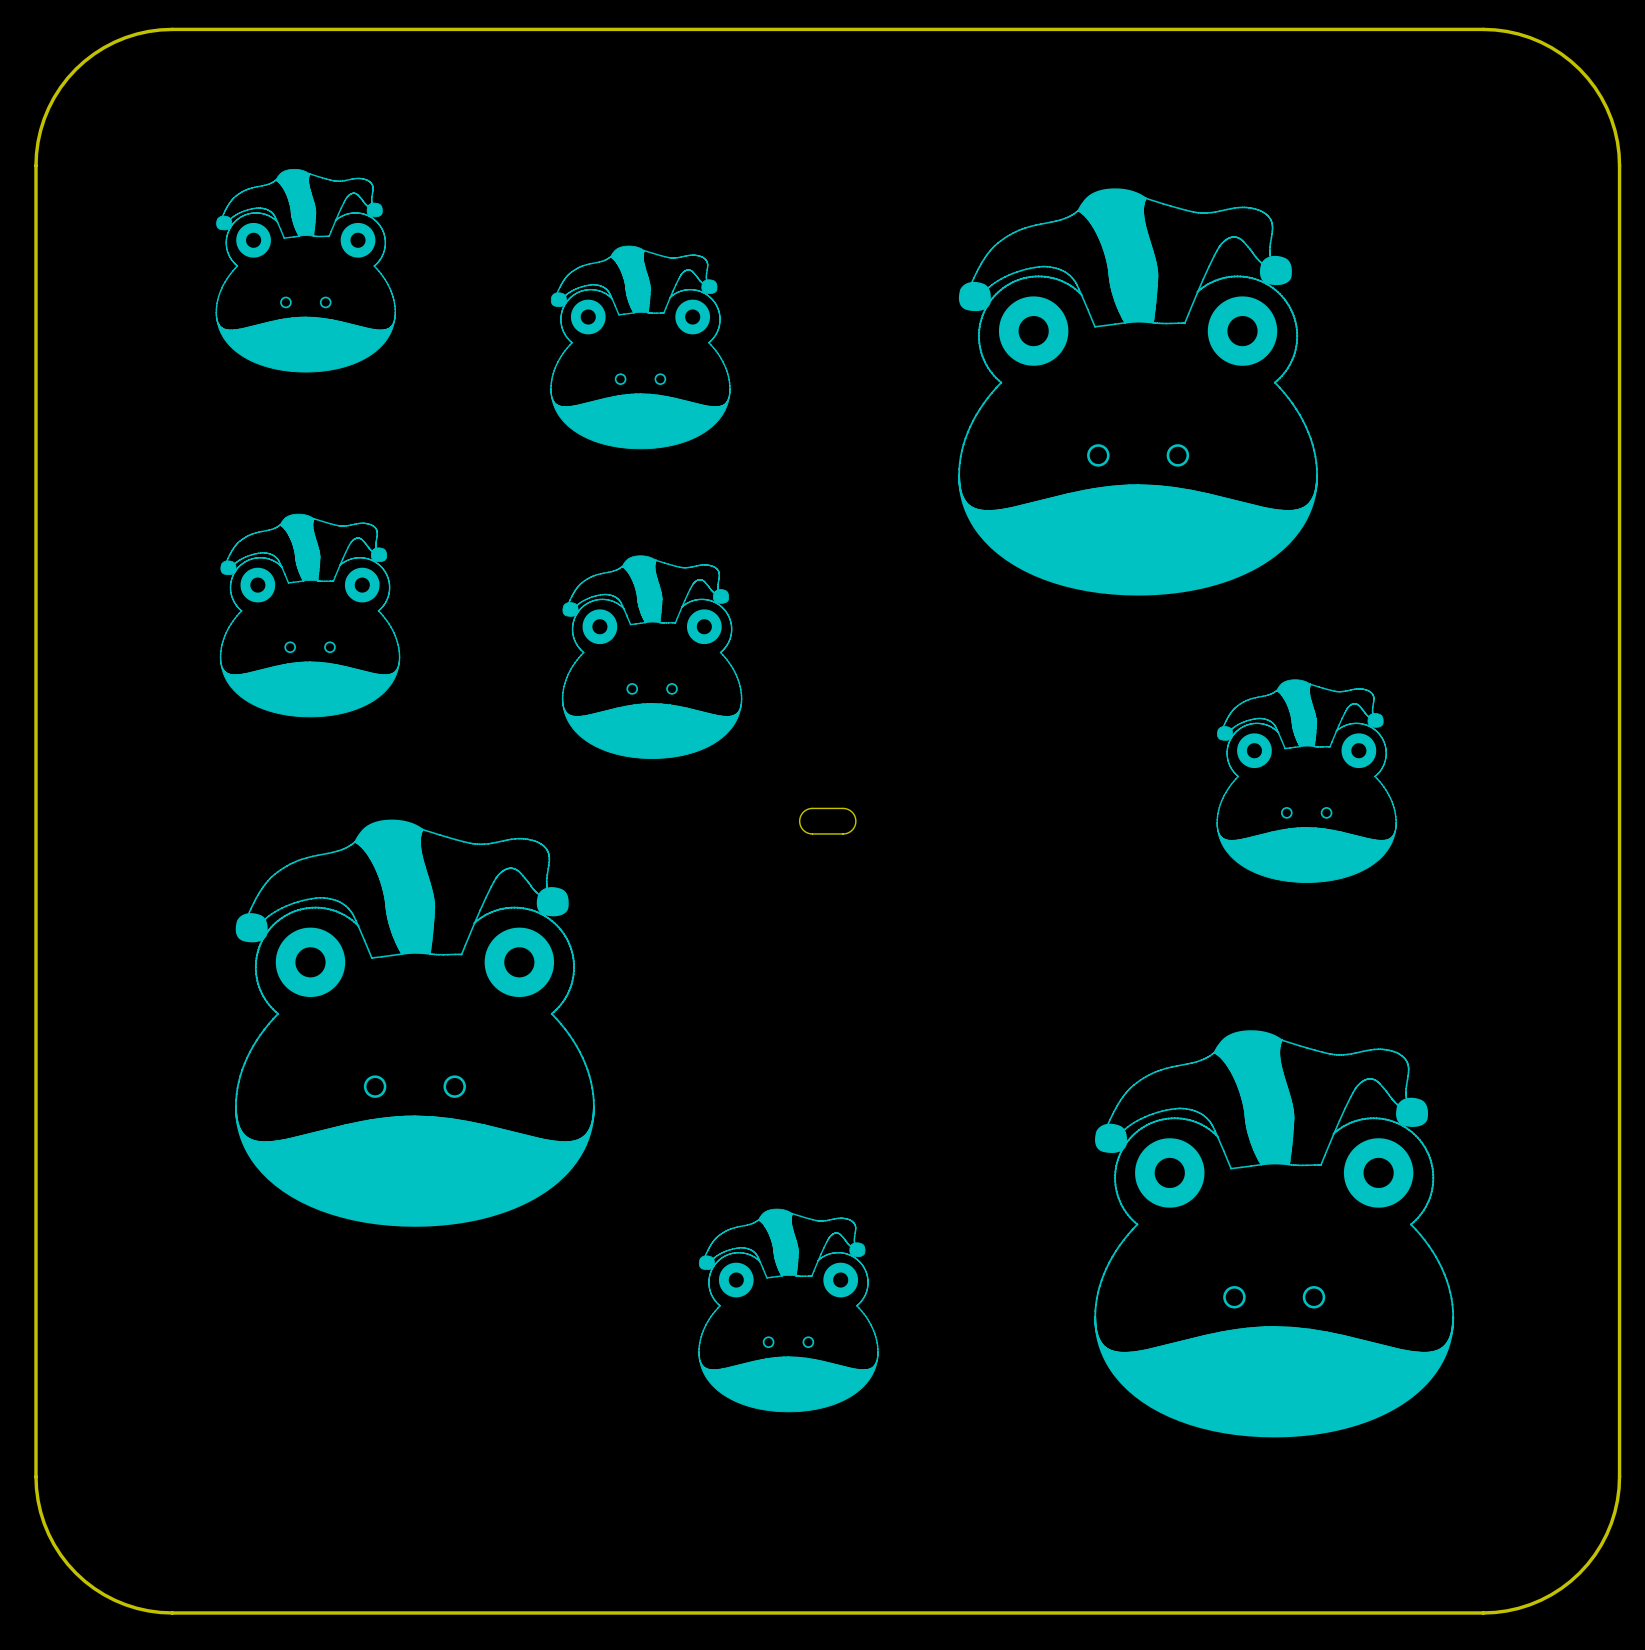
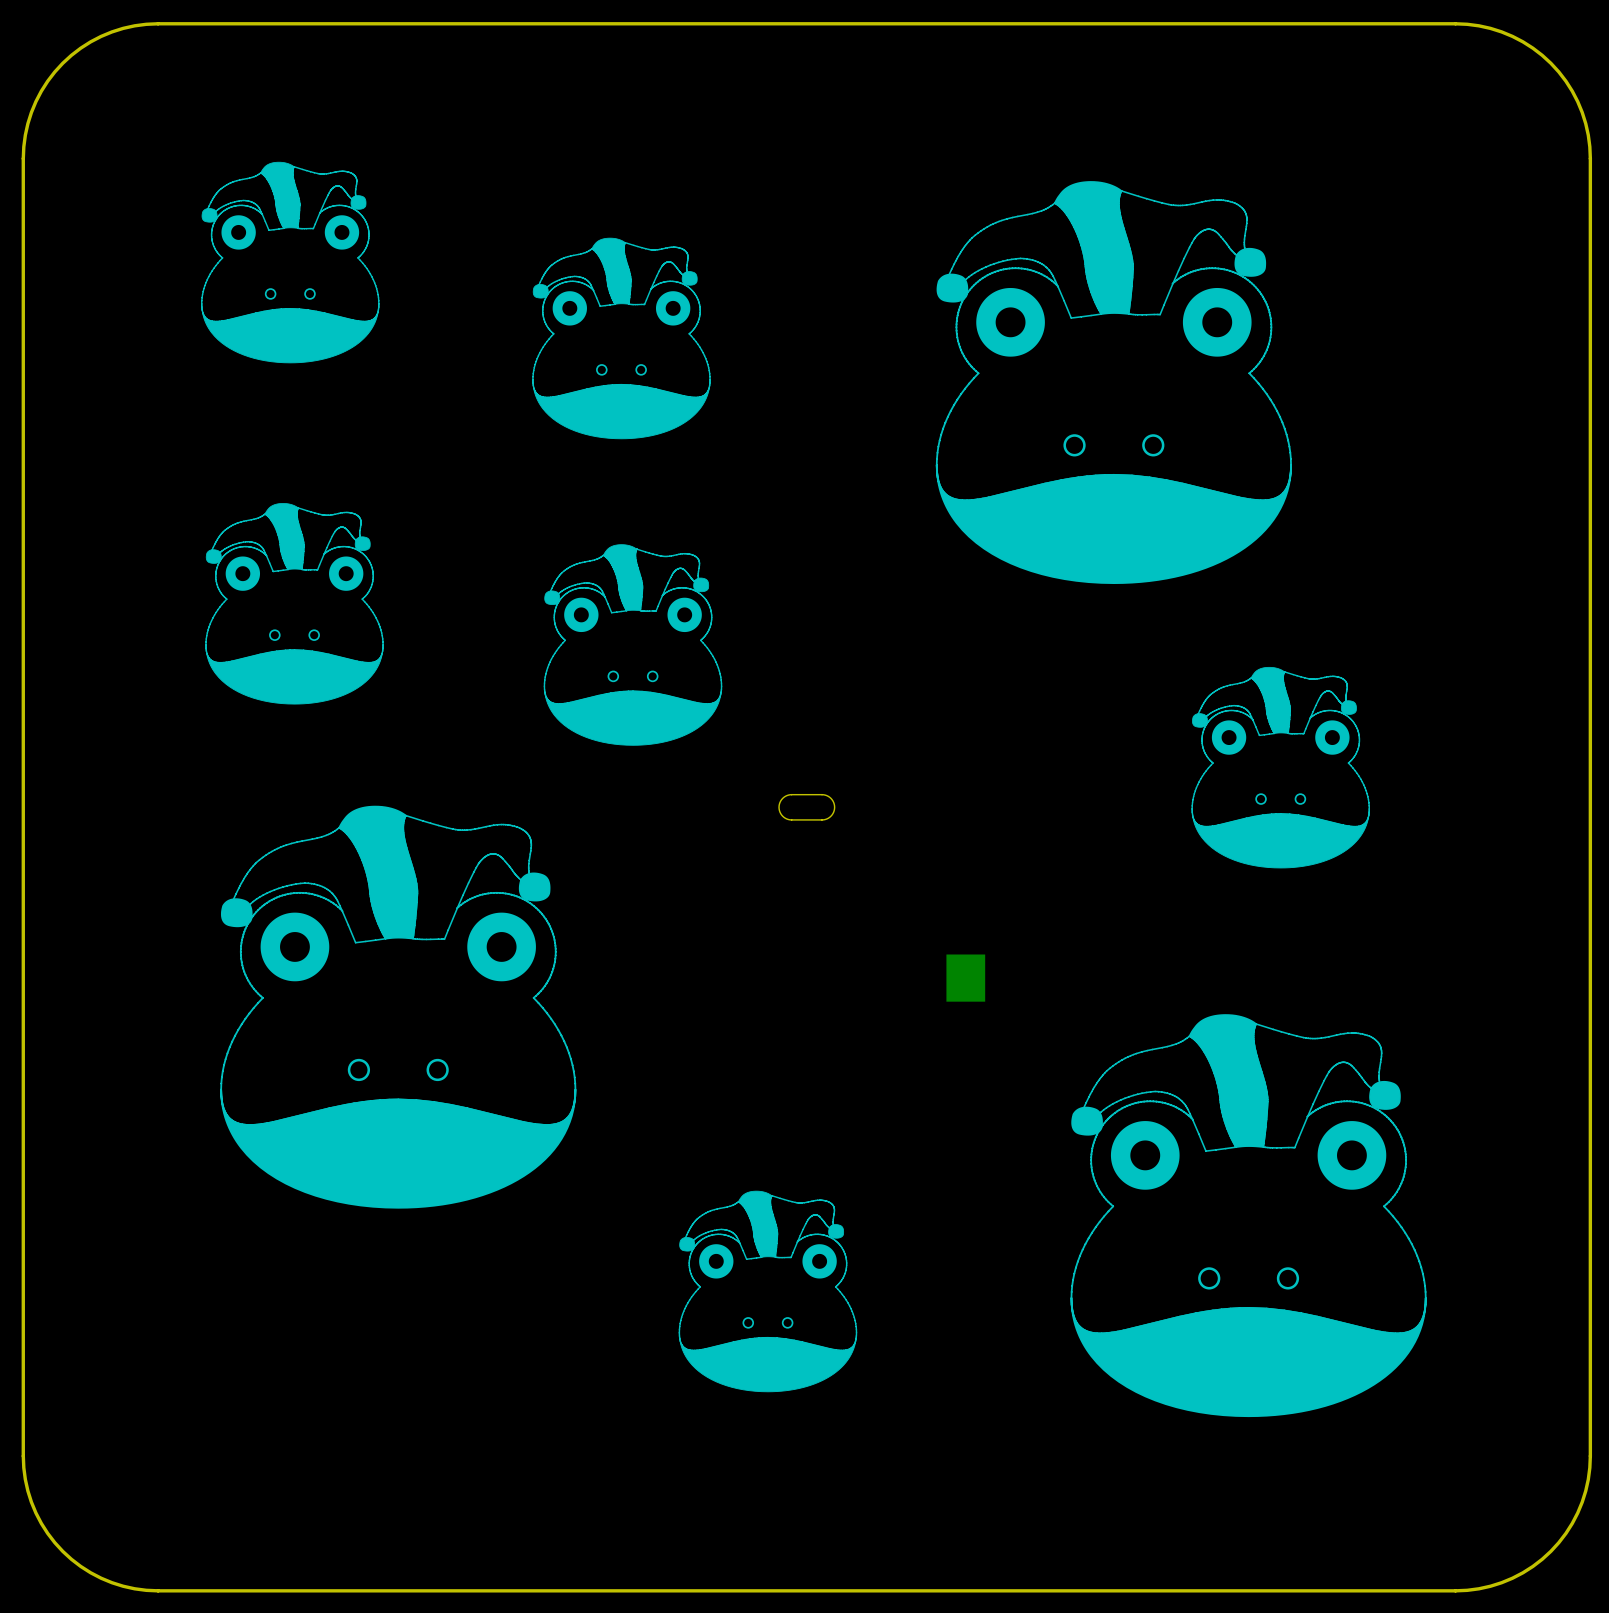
part: none -> (965, 978)

